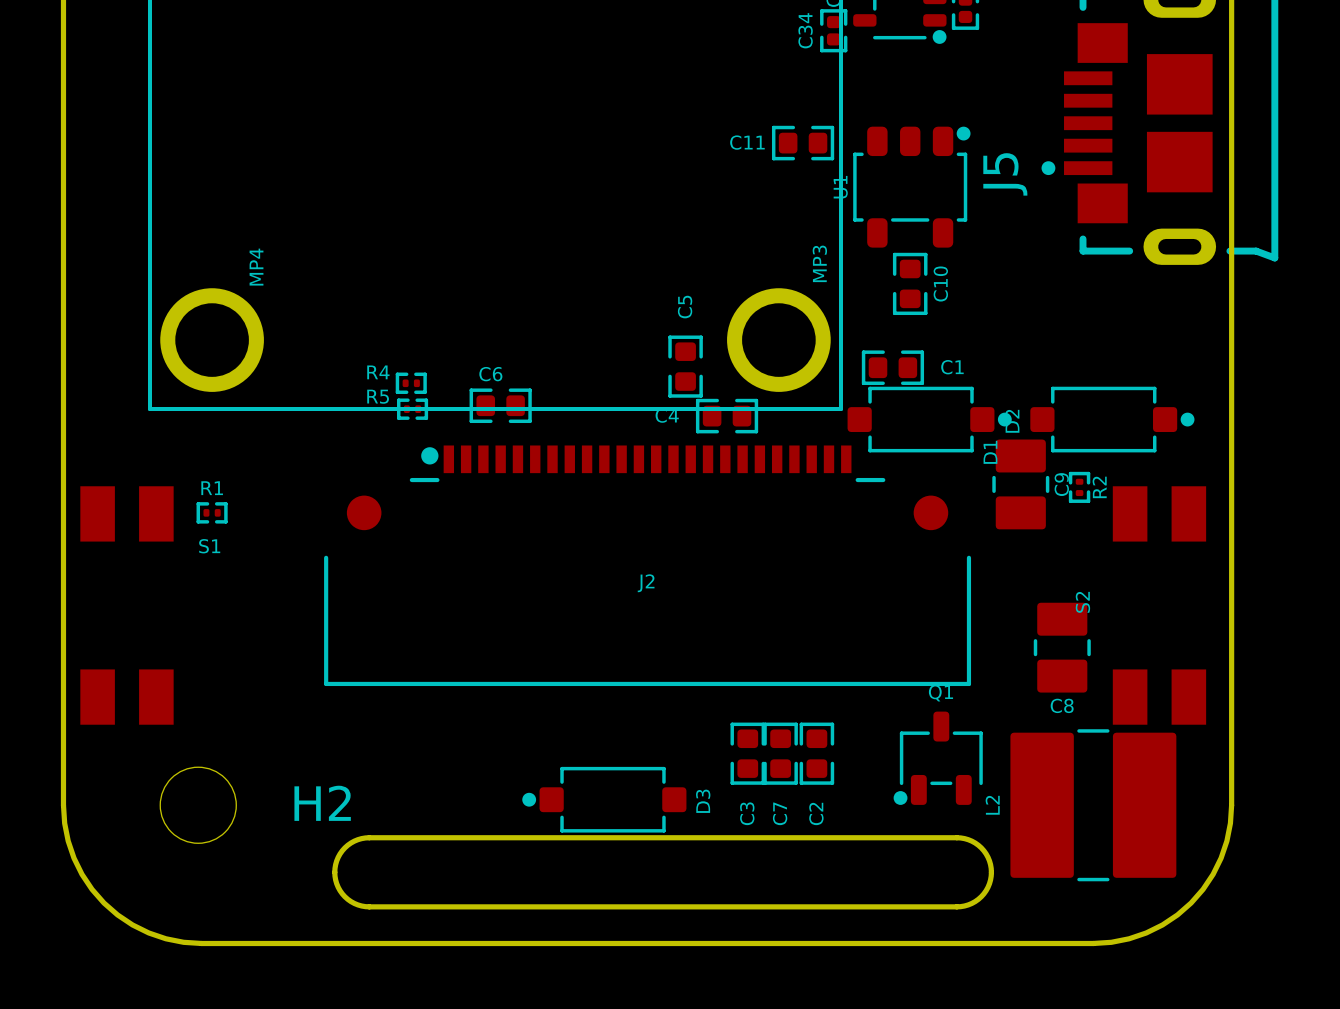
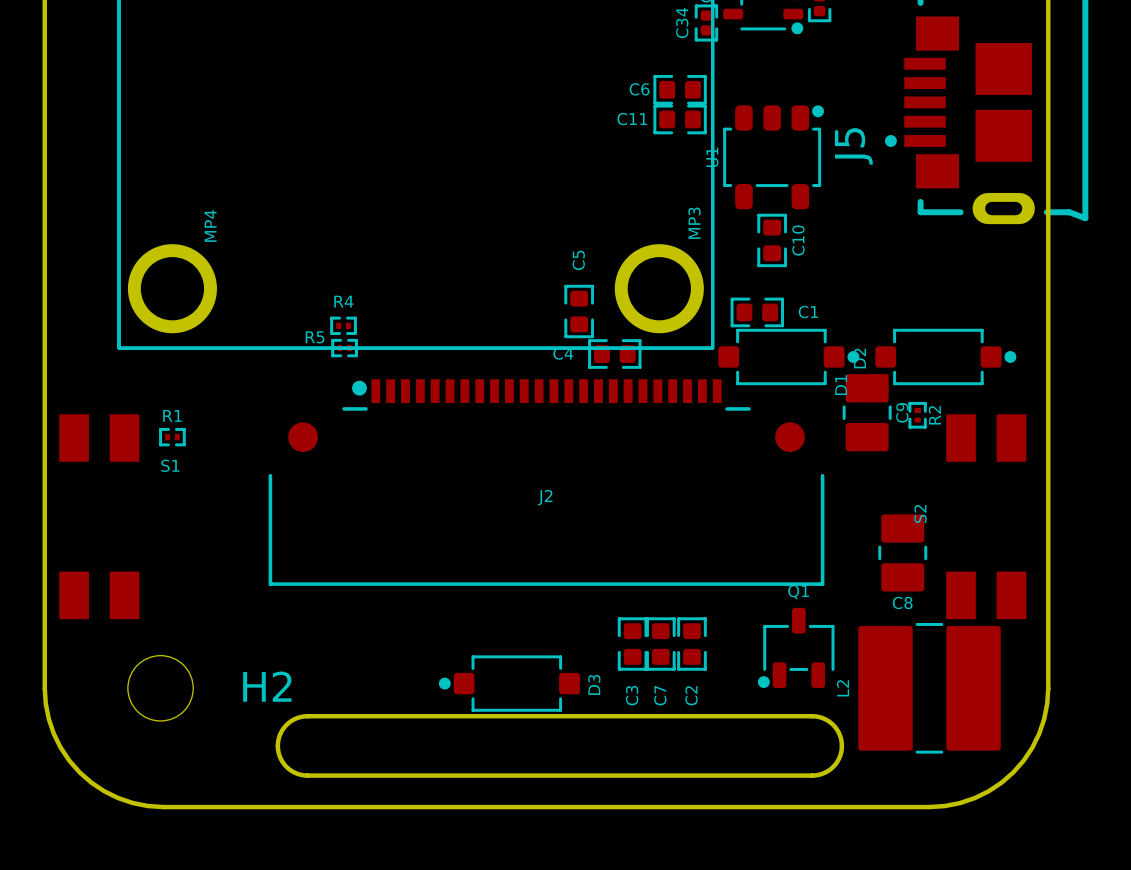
R4 name position: R4 (378, 372) -> R4 (343, 301)
C6 name position: C6 (490, 374) -> C6 (639, 89)
C6 position: (500, 405) -> (680, 89)

